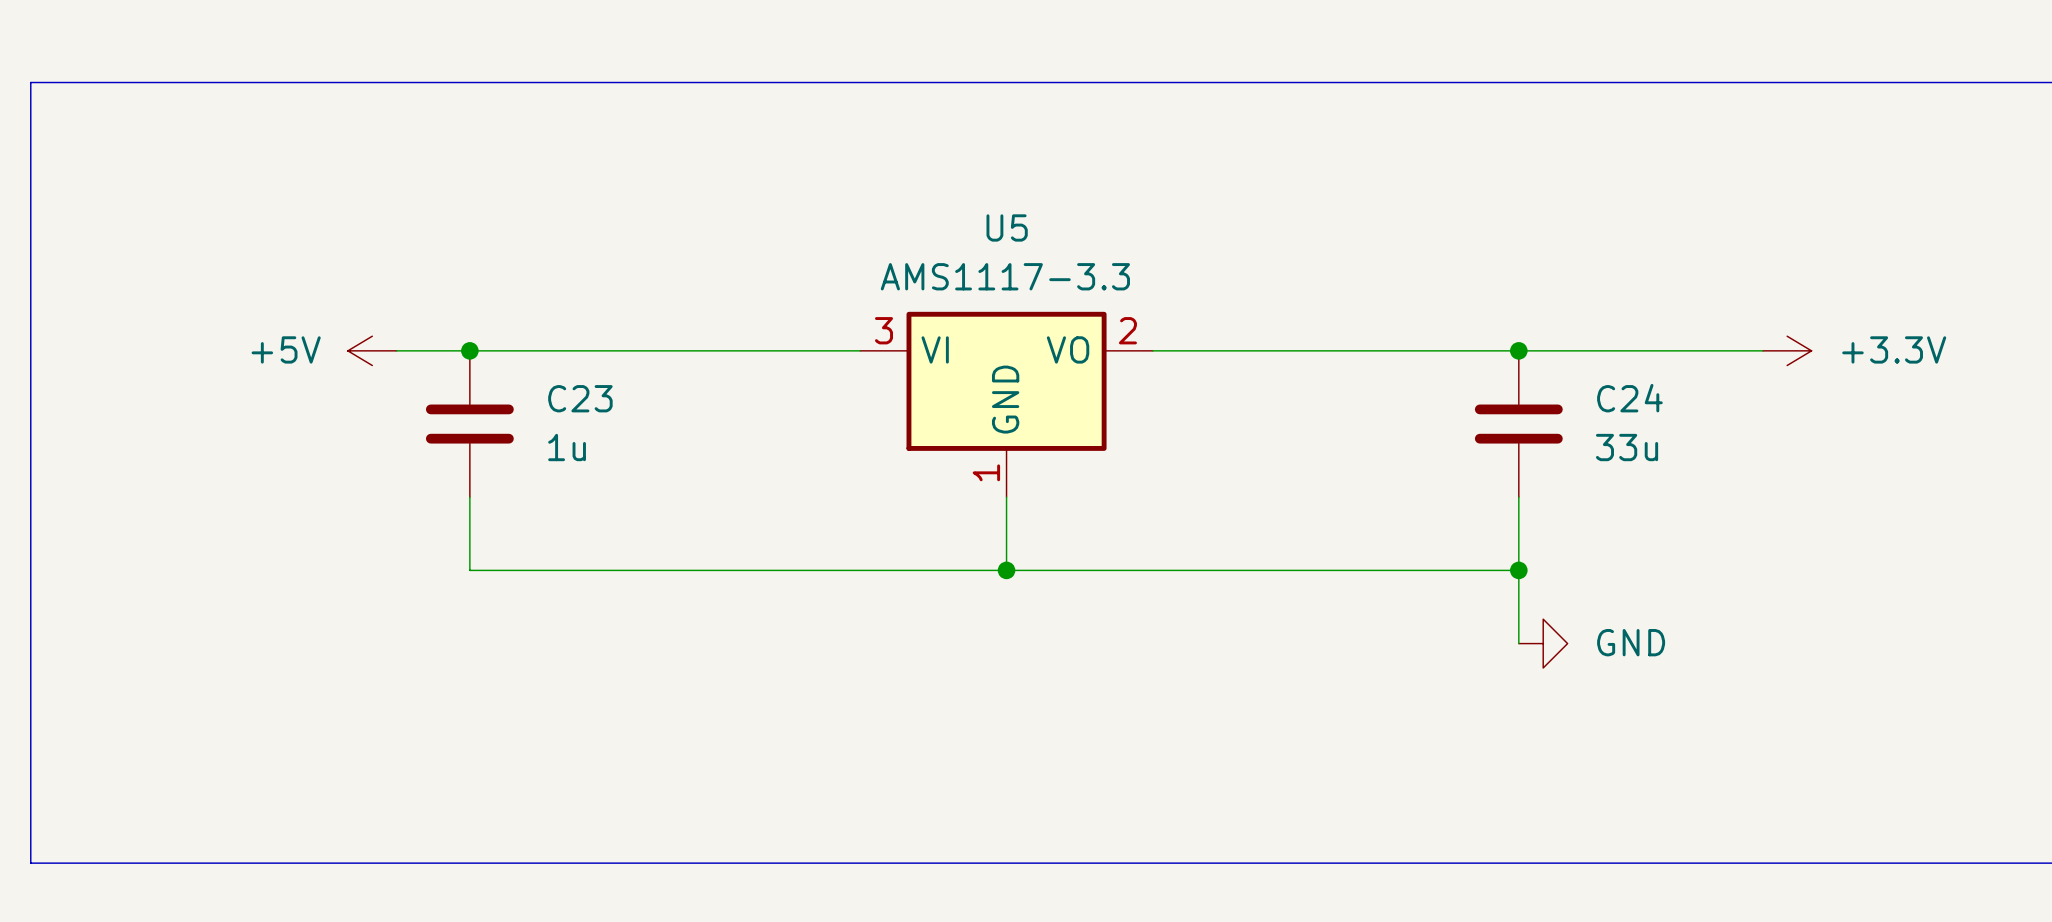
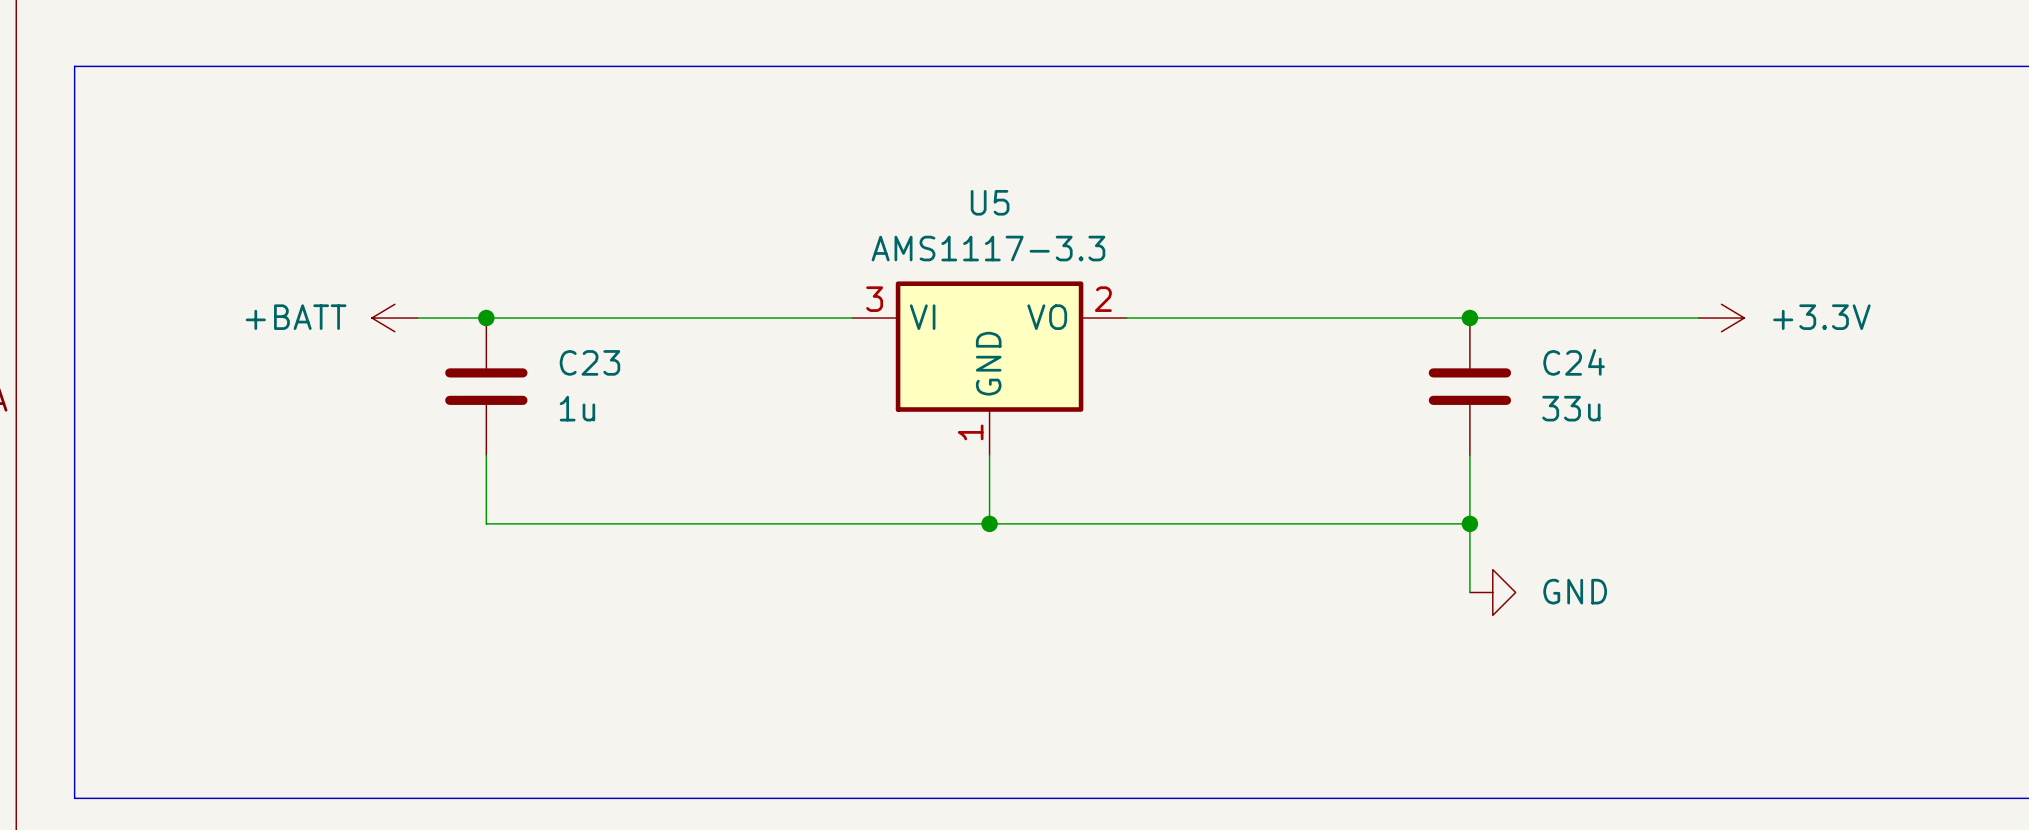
power symbol: +5V (372, 350) -> +BATT (394, 318)

